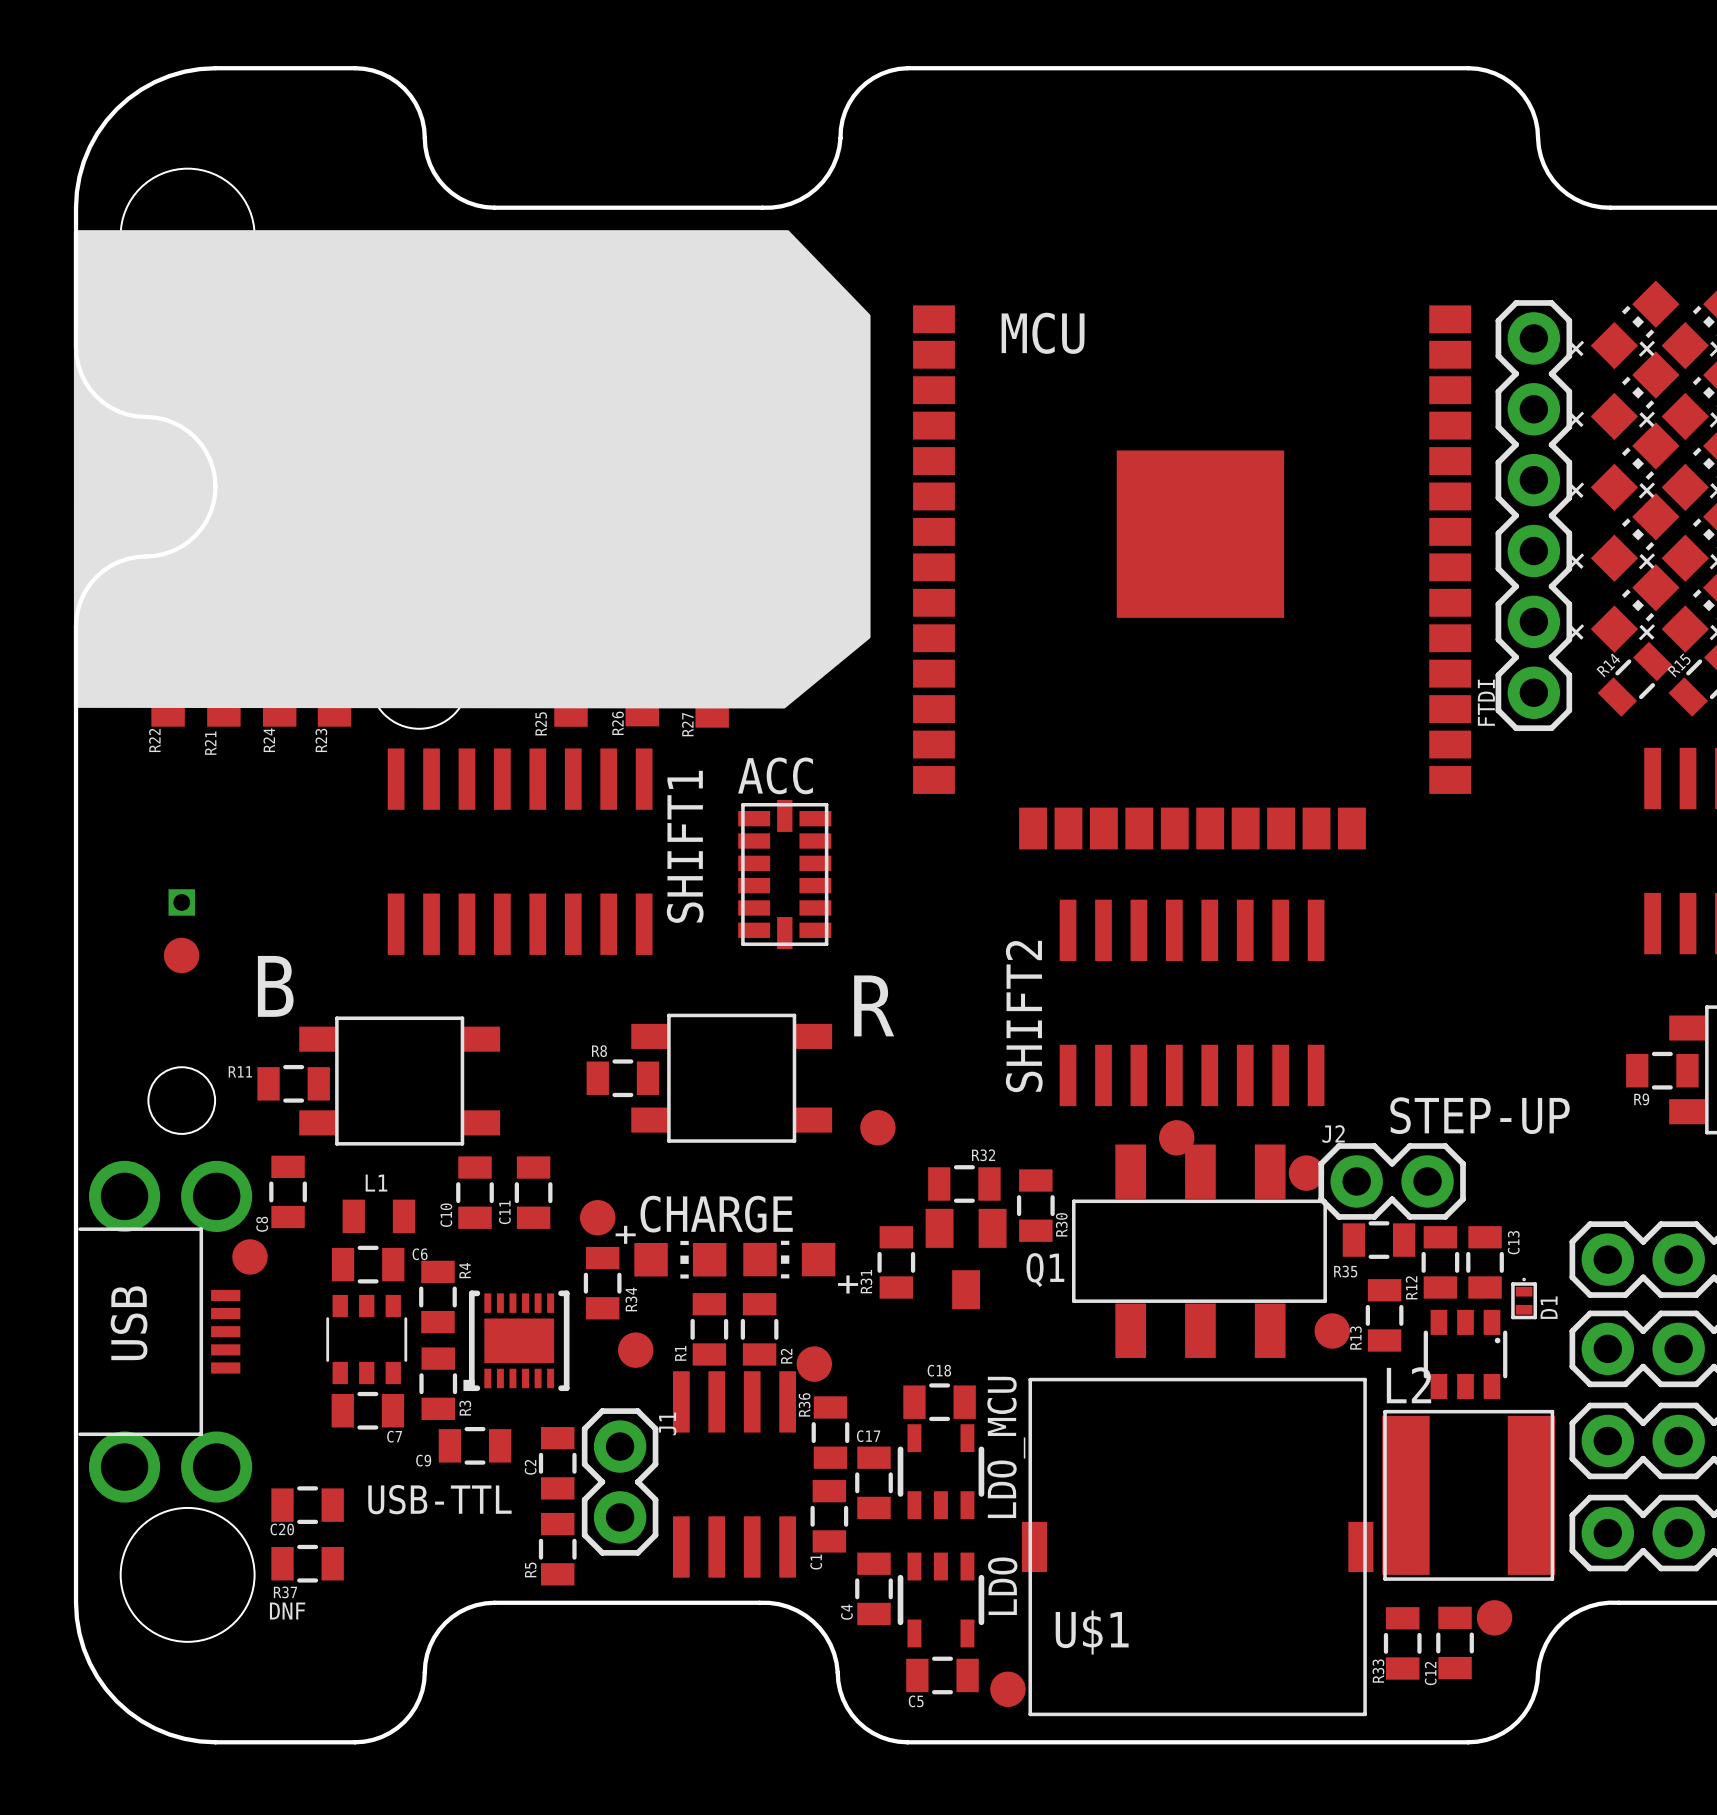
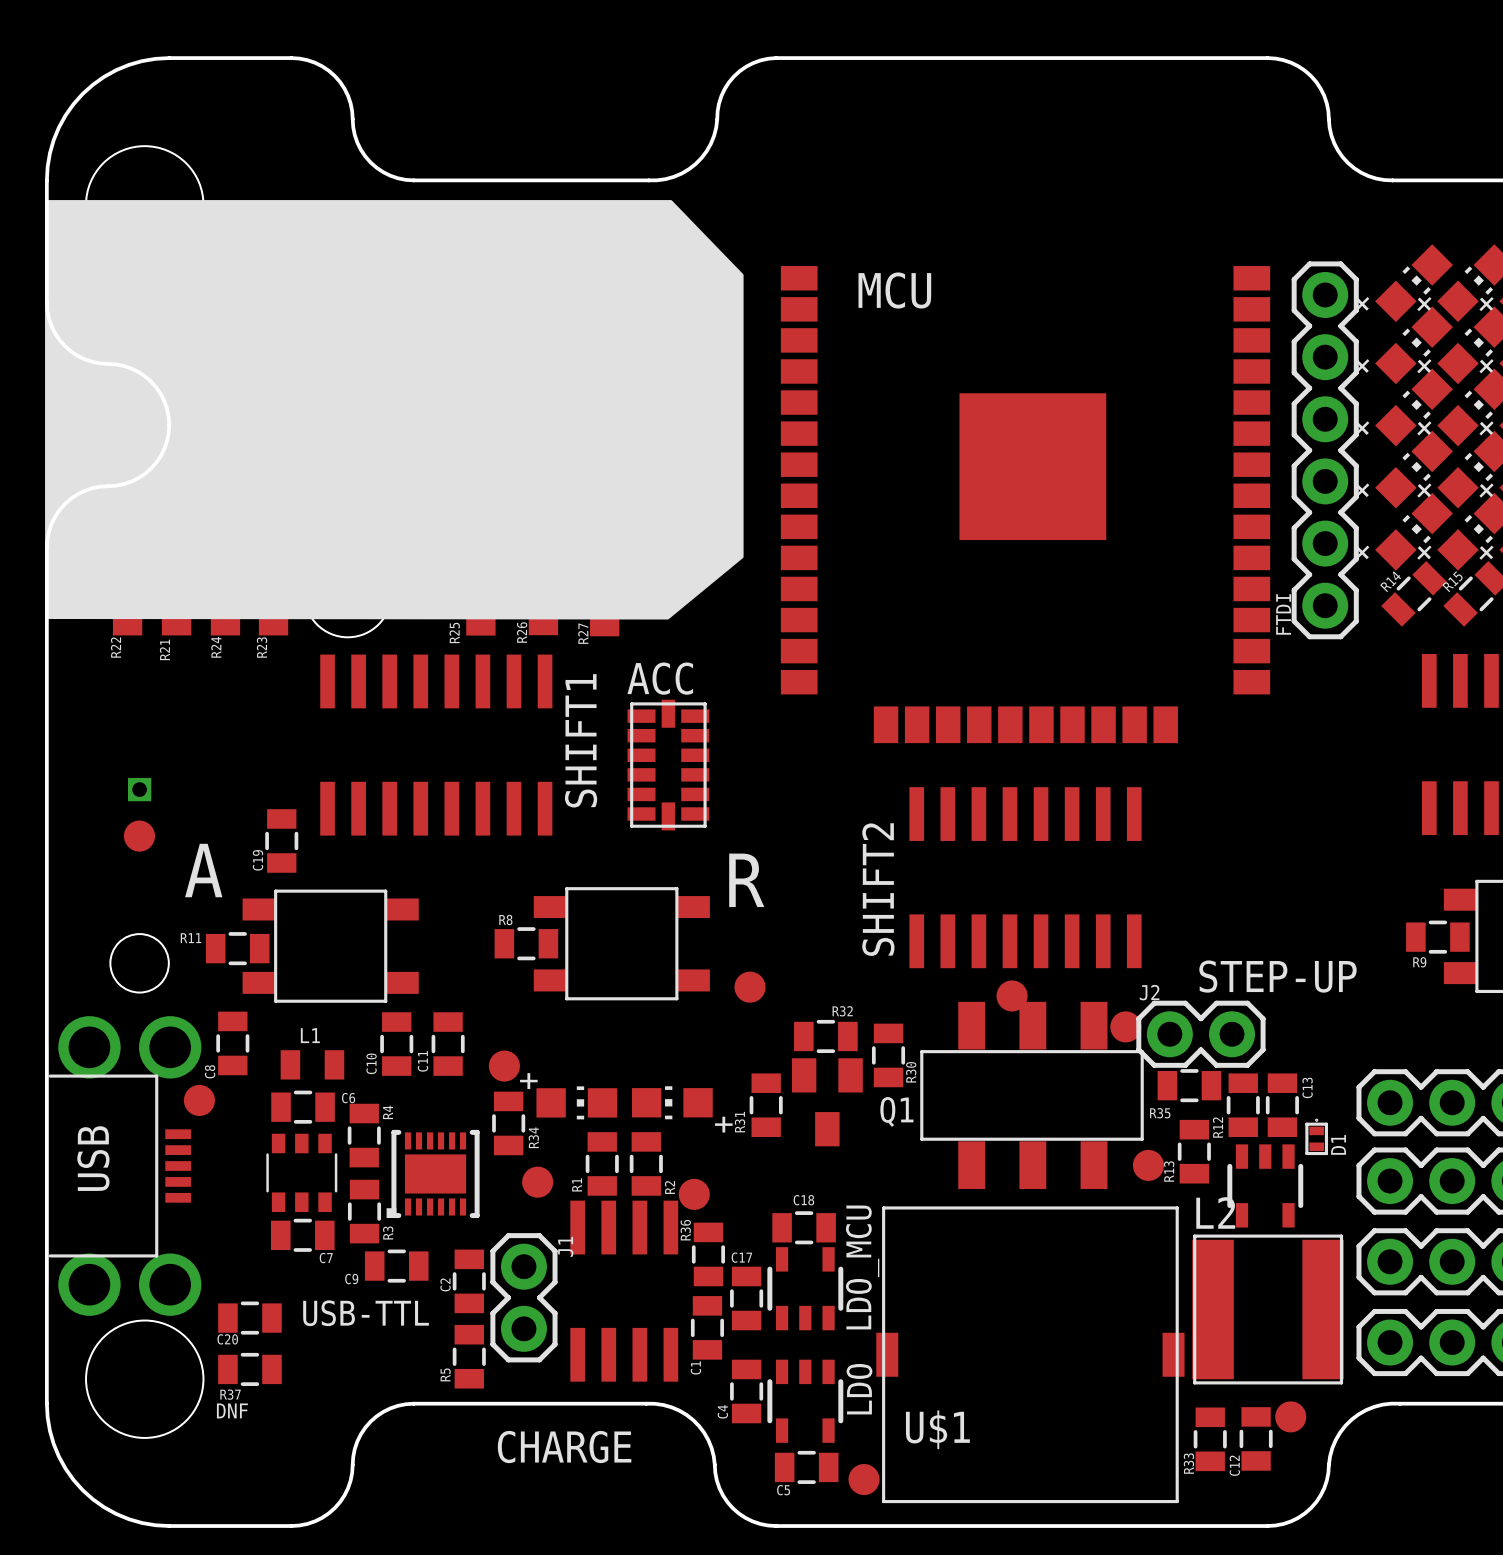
C19: none -> (281, 840)
B name: B (275, 986) -> A (203, 870)
CHARGE name position: CHARGE (716, 1214) -> CHARGE (564, 1447)
STEP-UP footprint: [1423, 1309, 1508, 1400] -> [1227, 1144, 1304, 1228]

